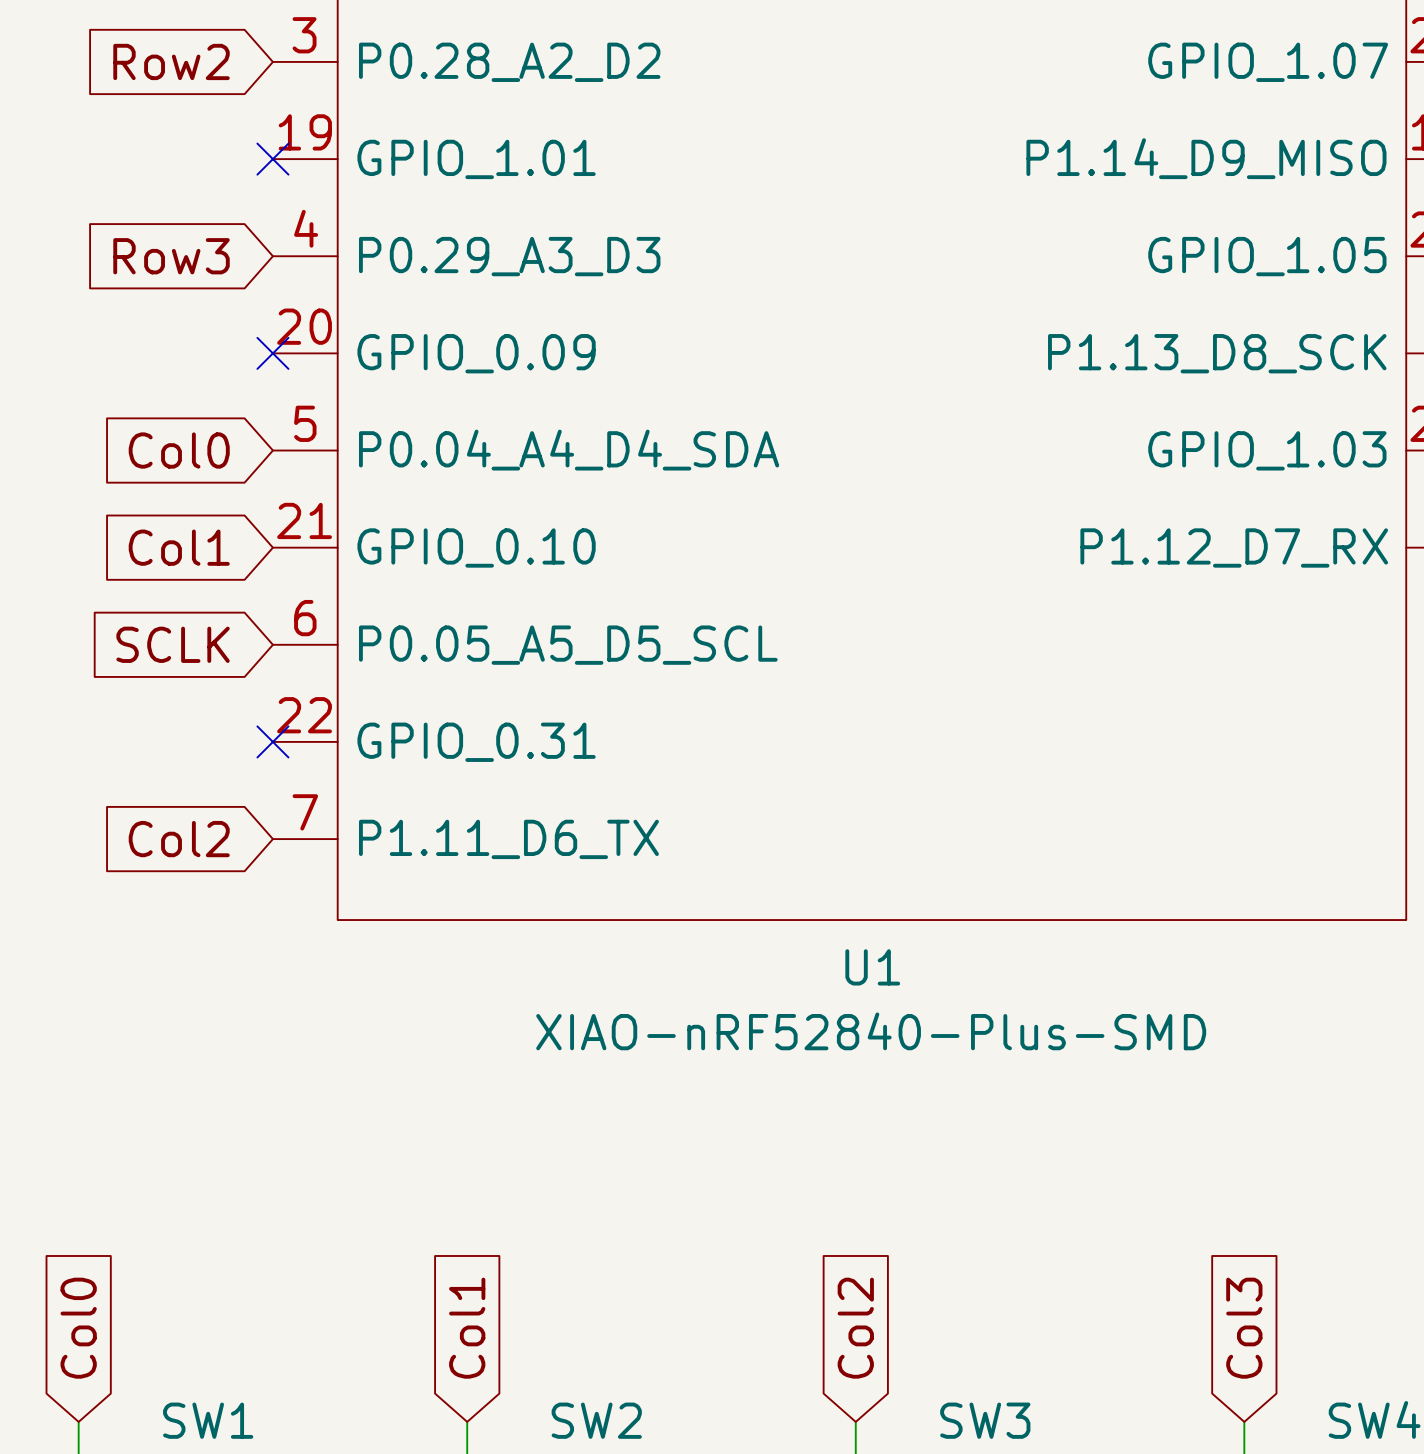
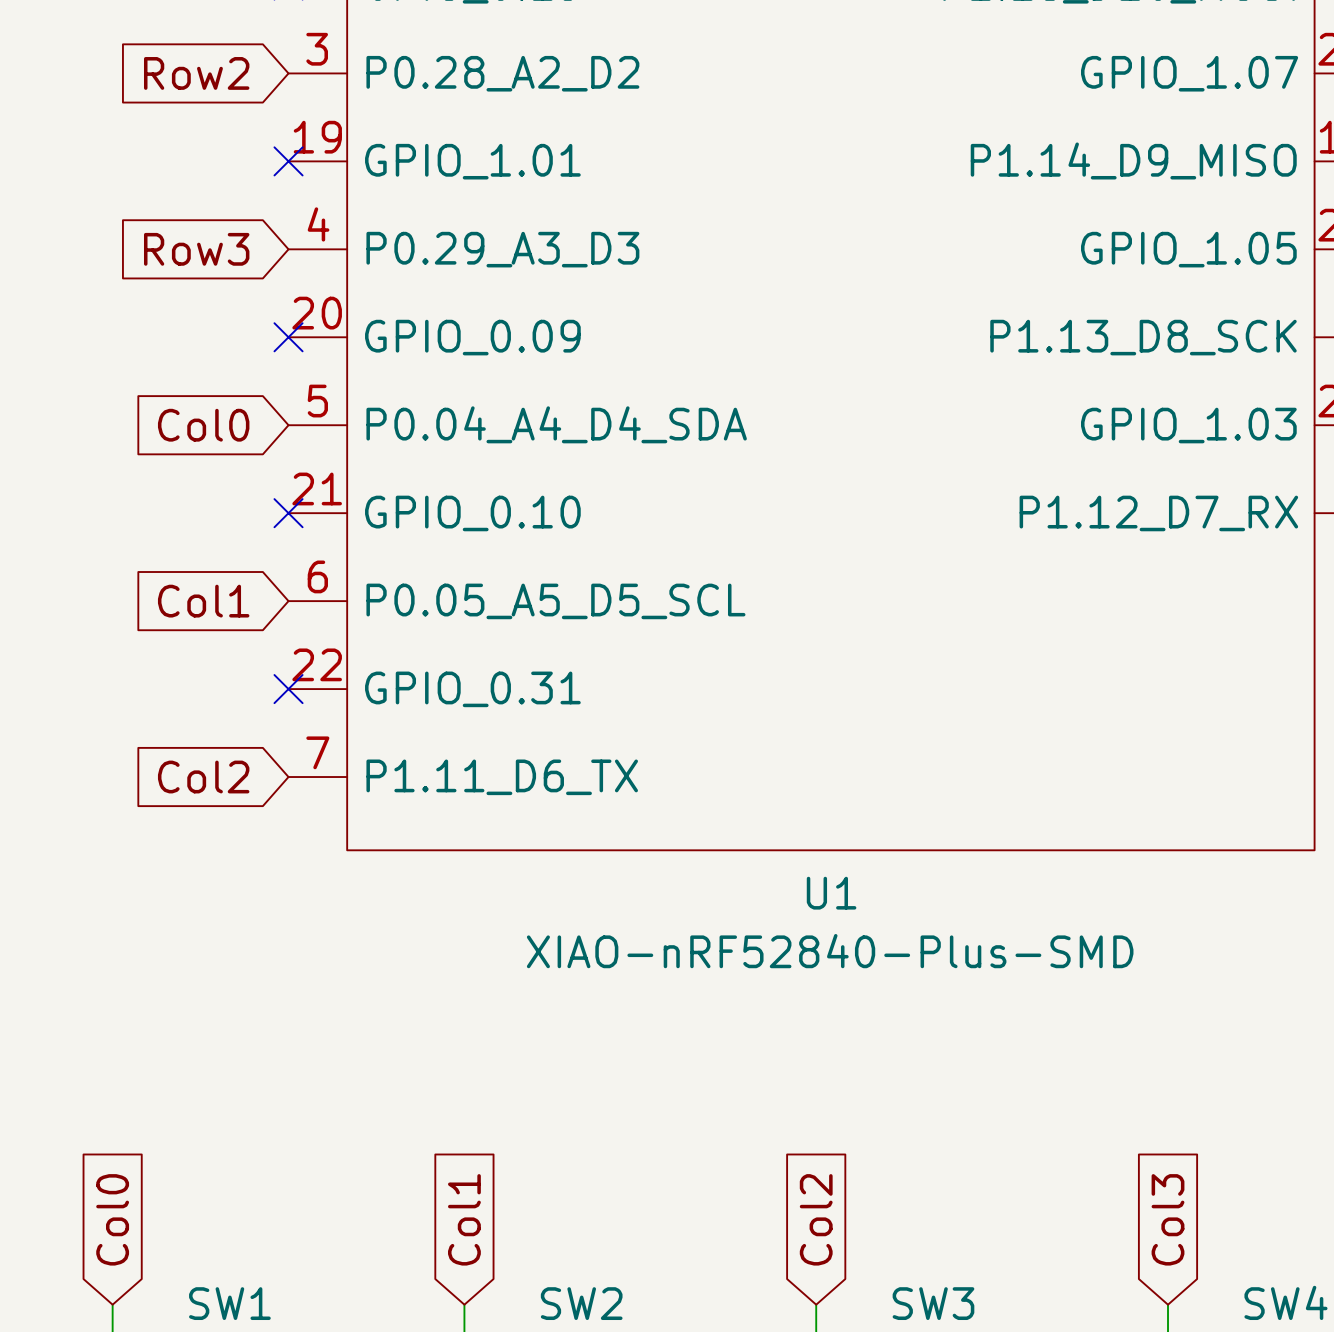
global label: Col1 (179, 547) -> none
no-connect mark: none -> (288, 513)
global label: SCLK (173, 644) -> Col1 (203, 601)

